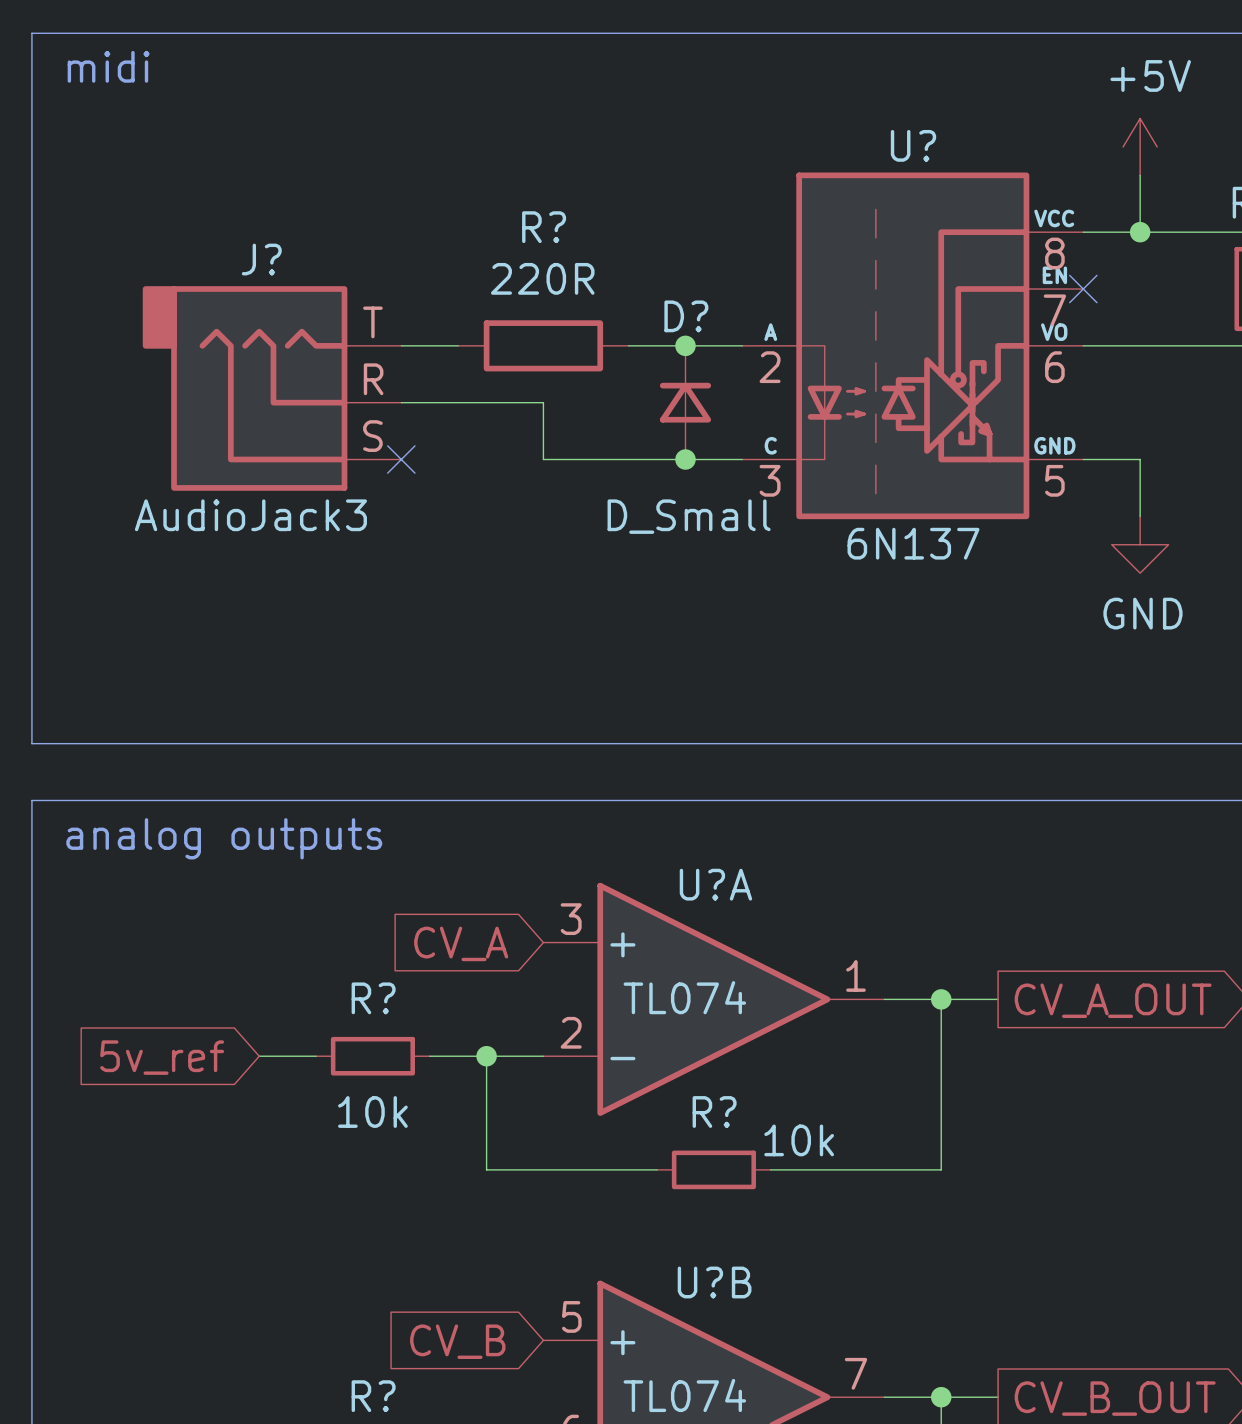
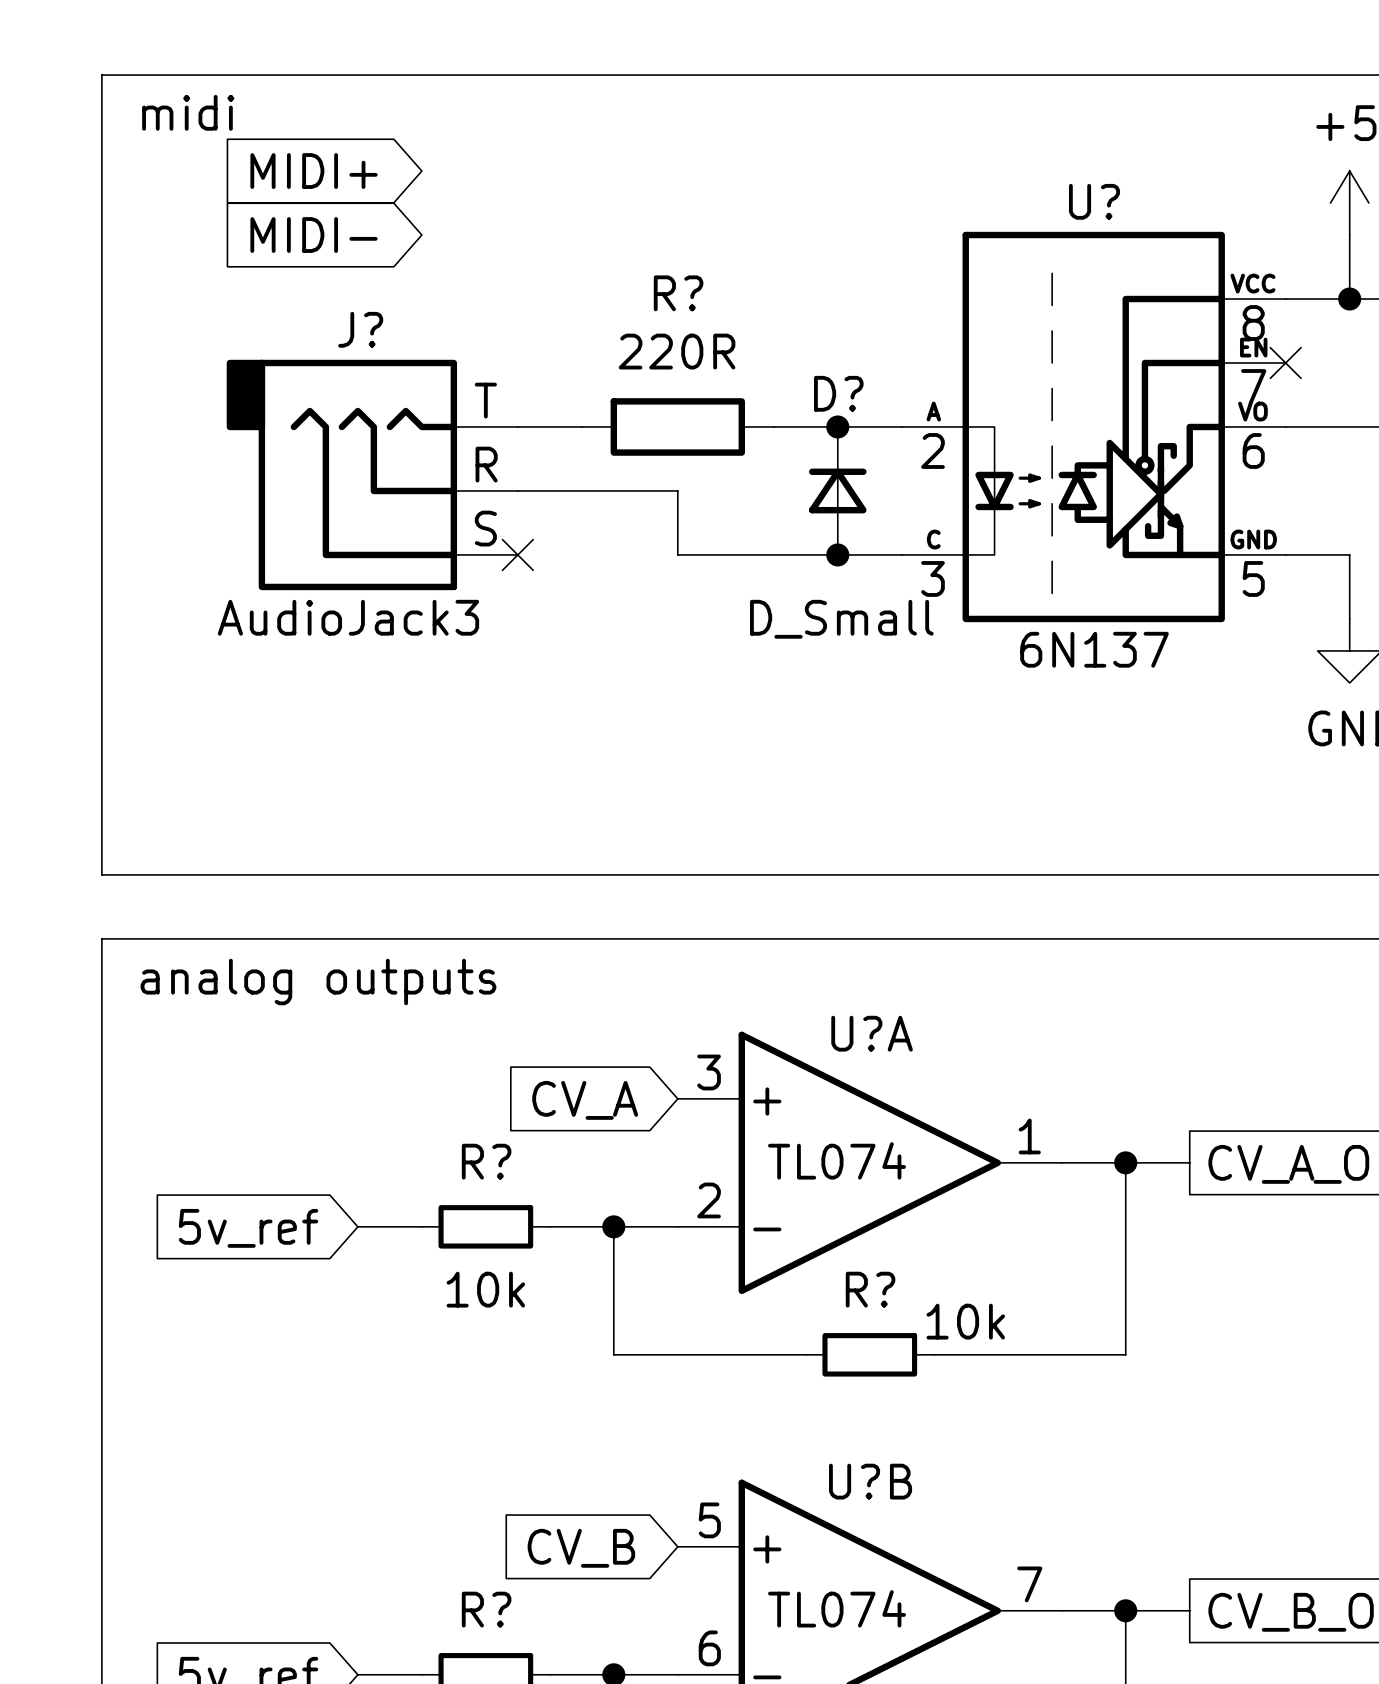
global label: none -> MIDI+ (314, 171)
global label: none -> MIDI- (314, 235)

